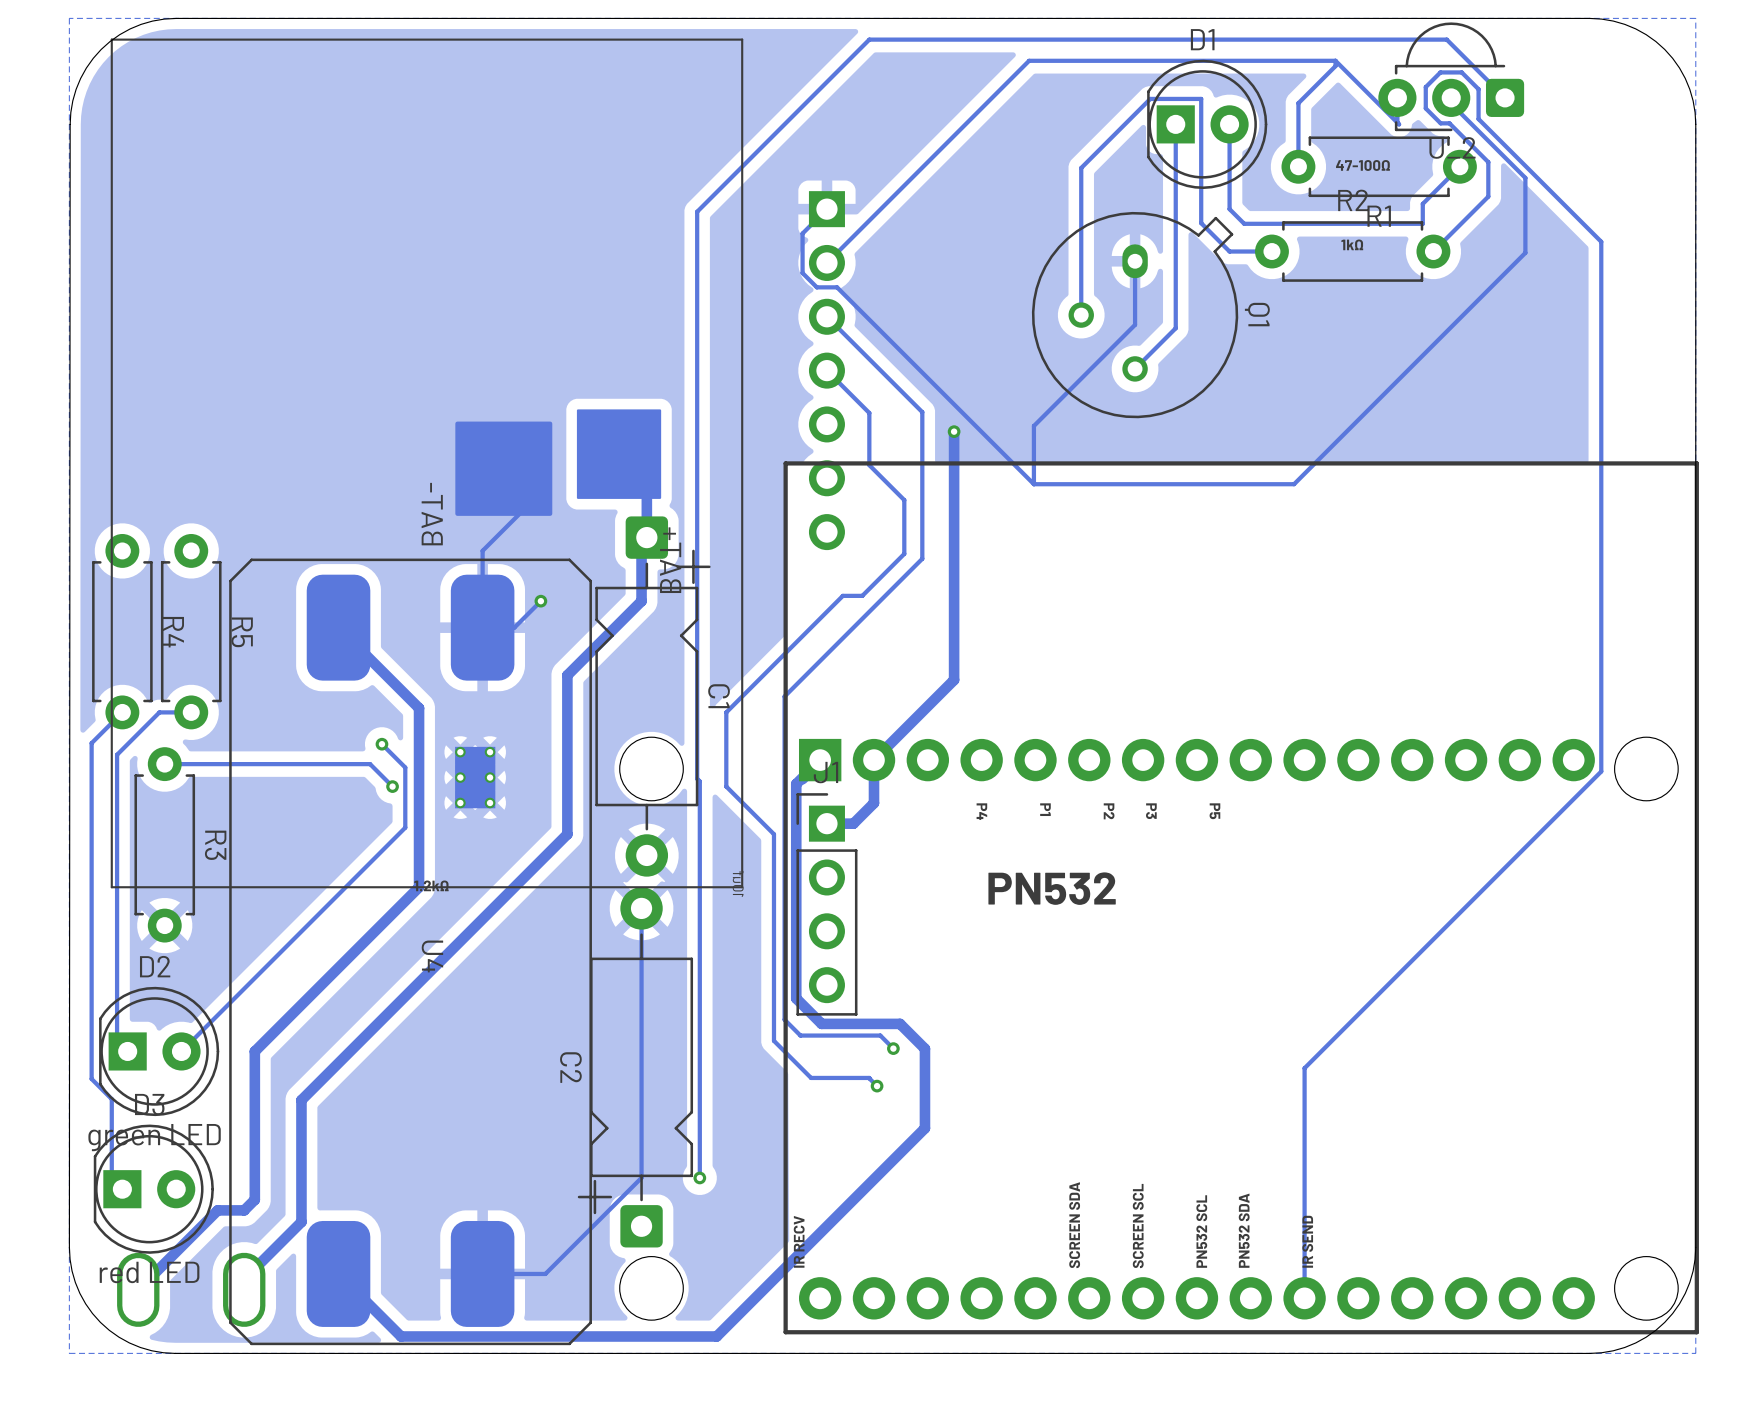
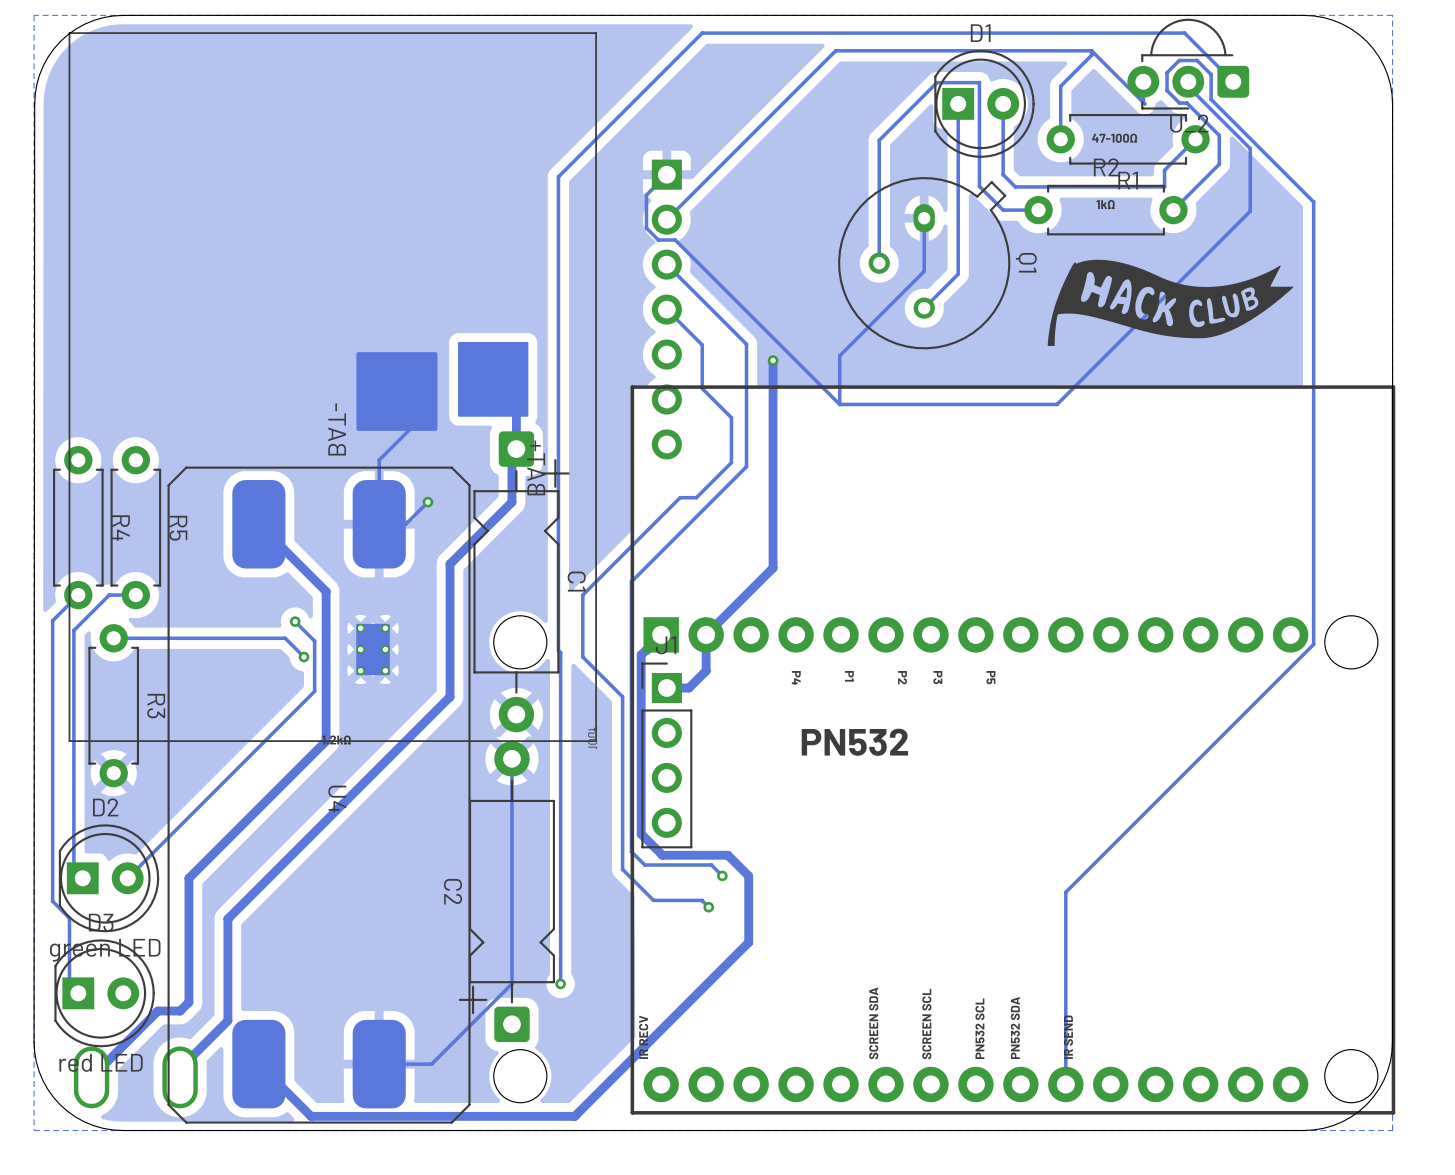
drawing: none -> [1047, 259, 1294, 346]

